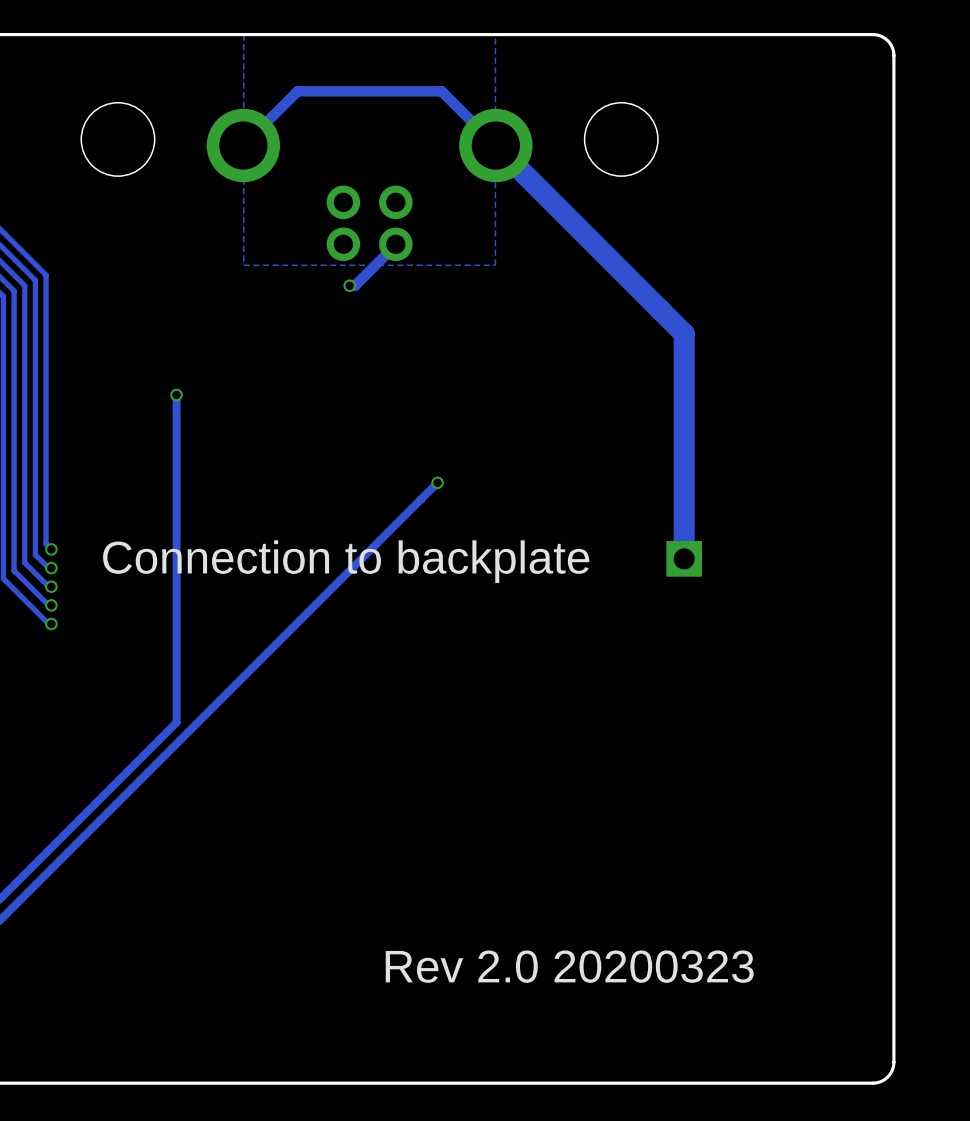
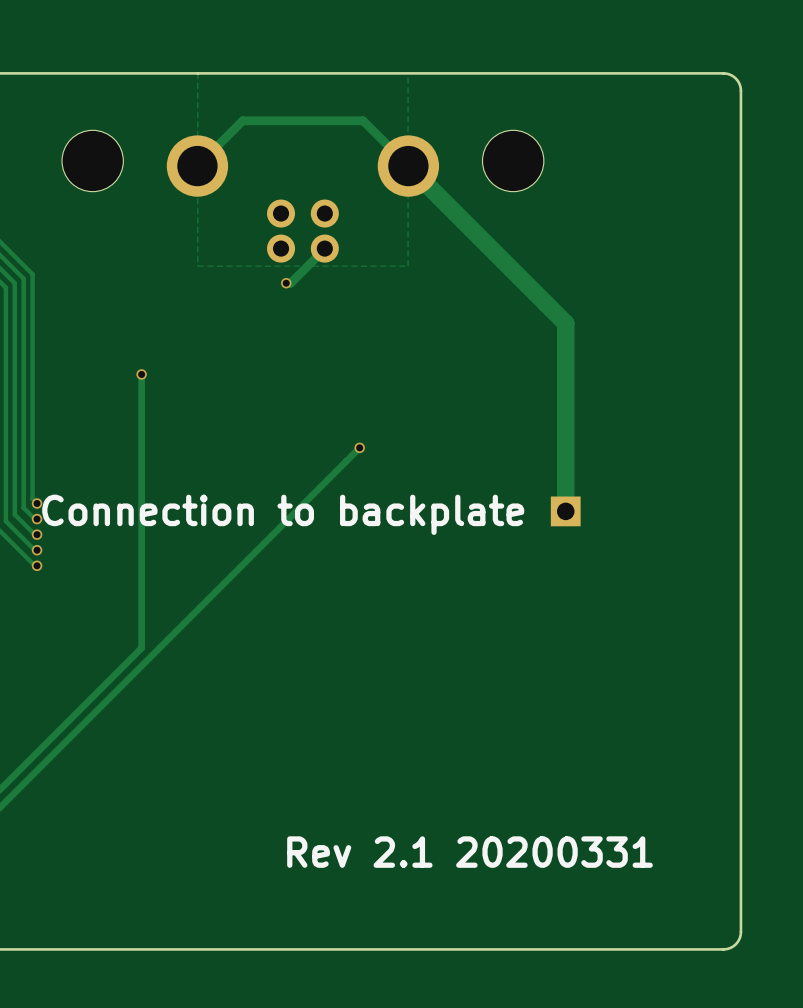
text: Rev 2.0 20200323 (569, 966) -> Rev 2.1 20200331 (470, 852)

